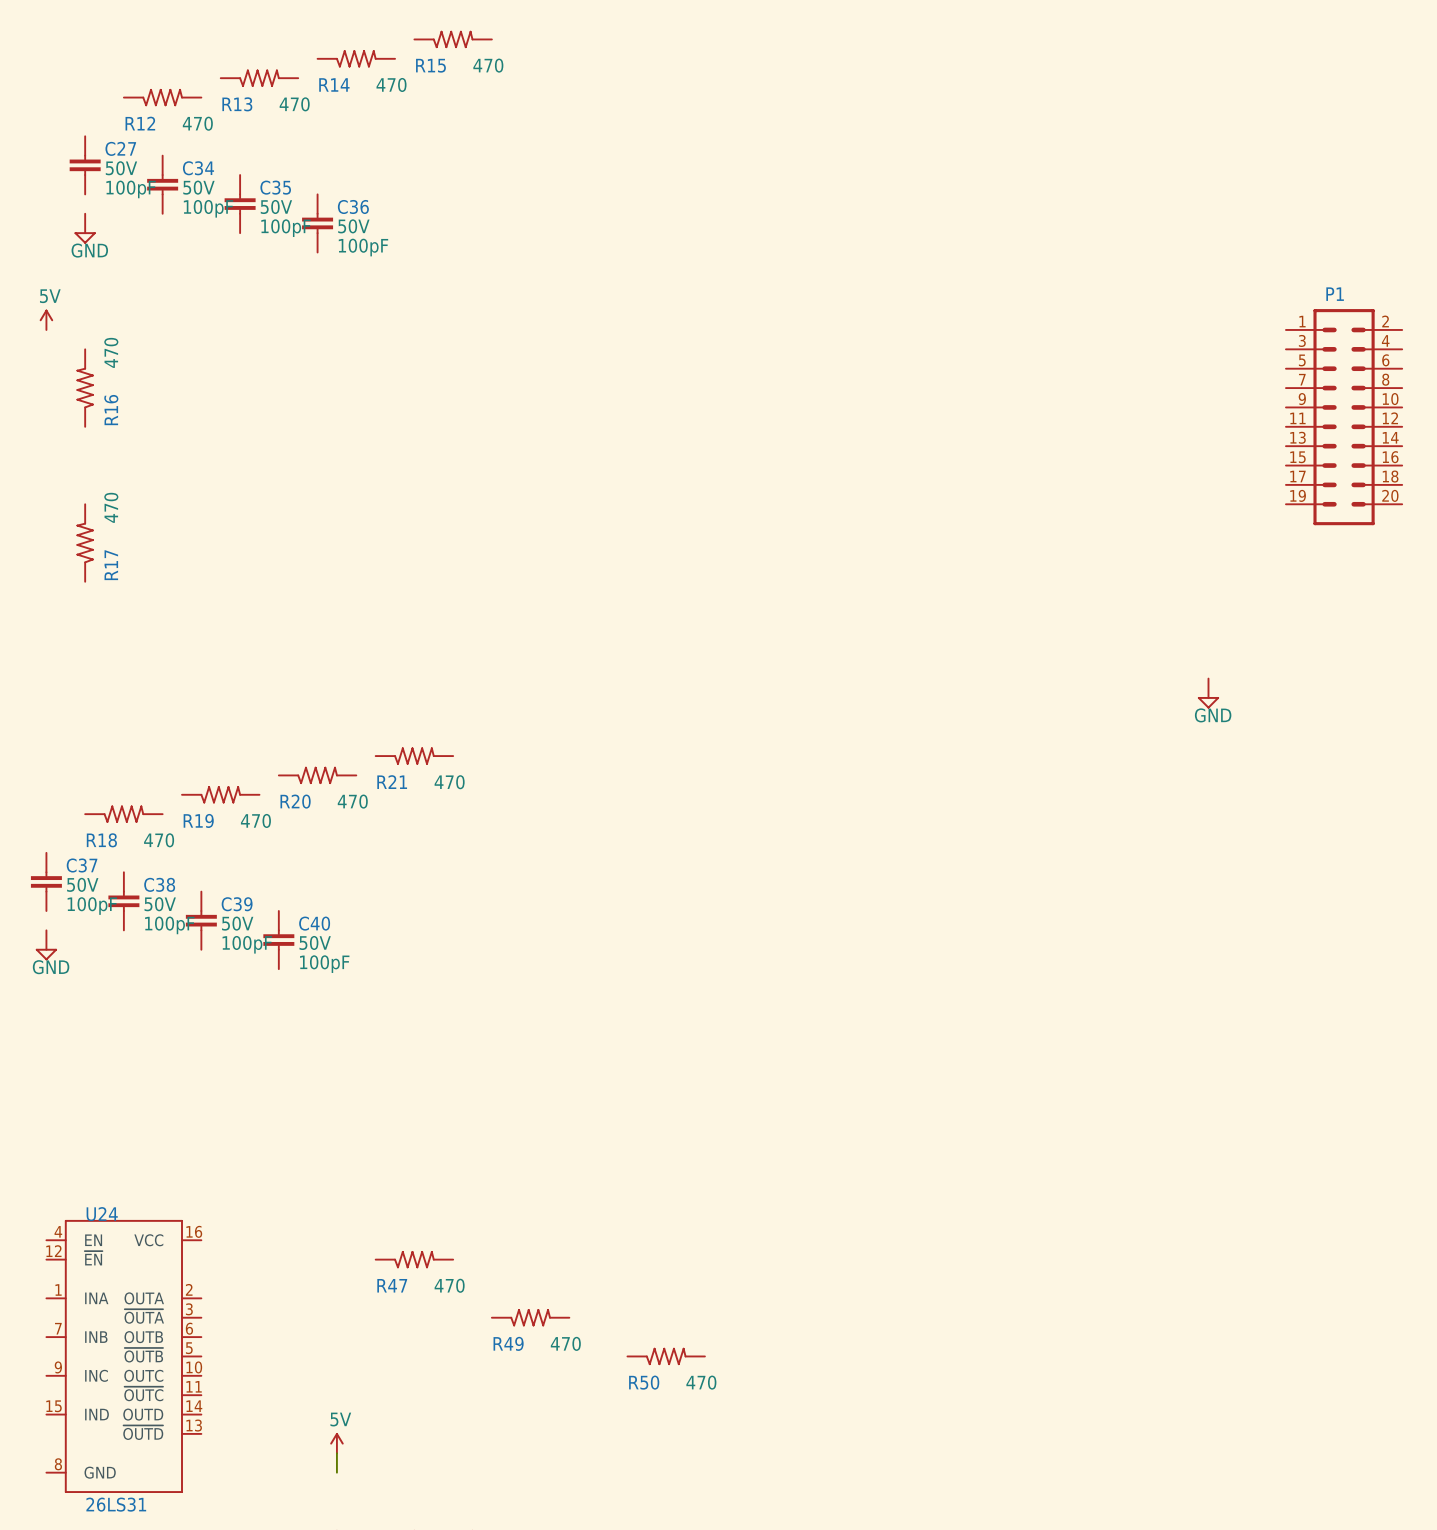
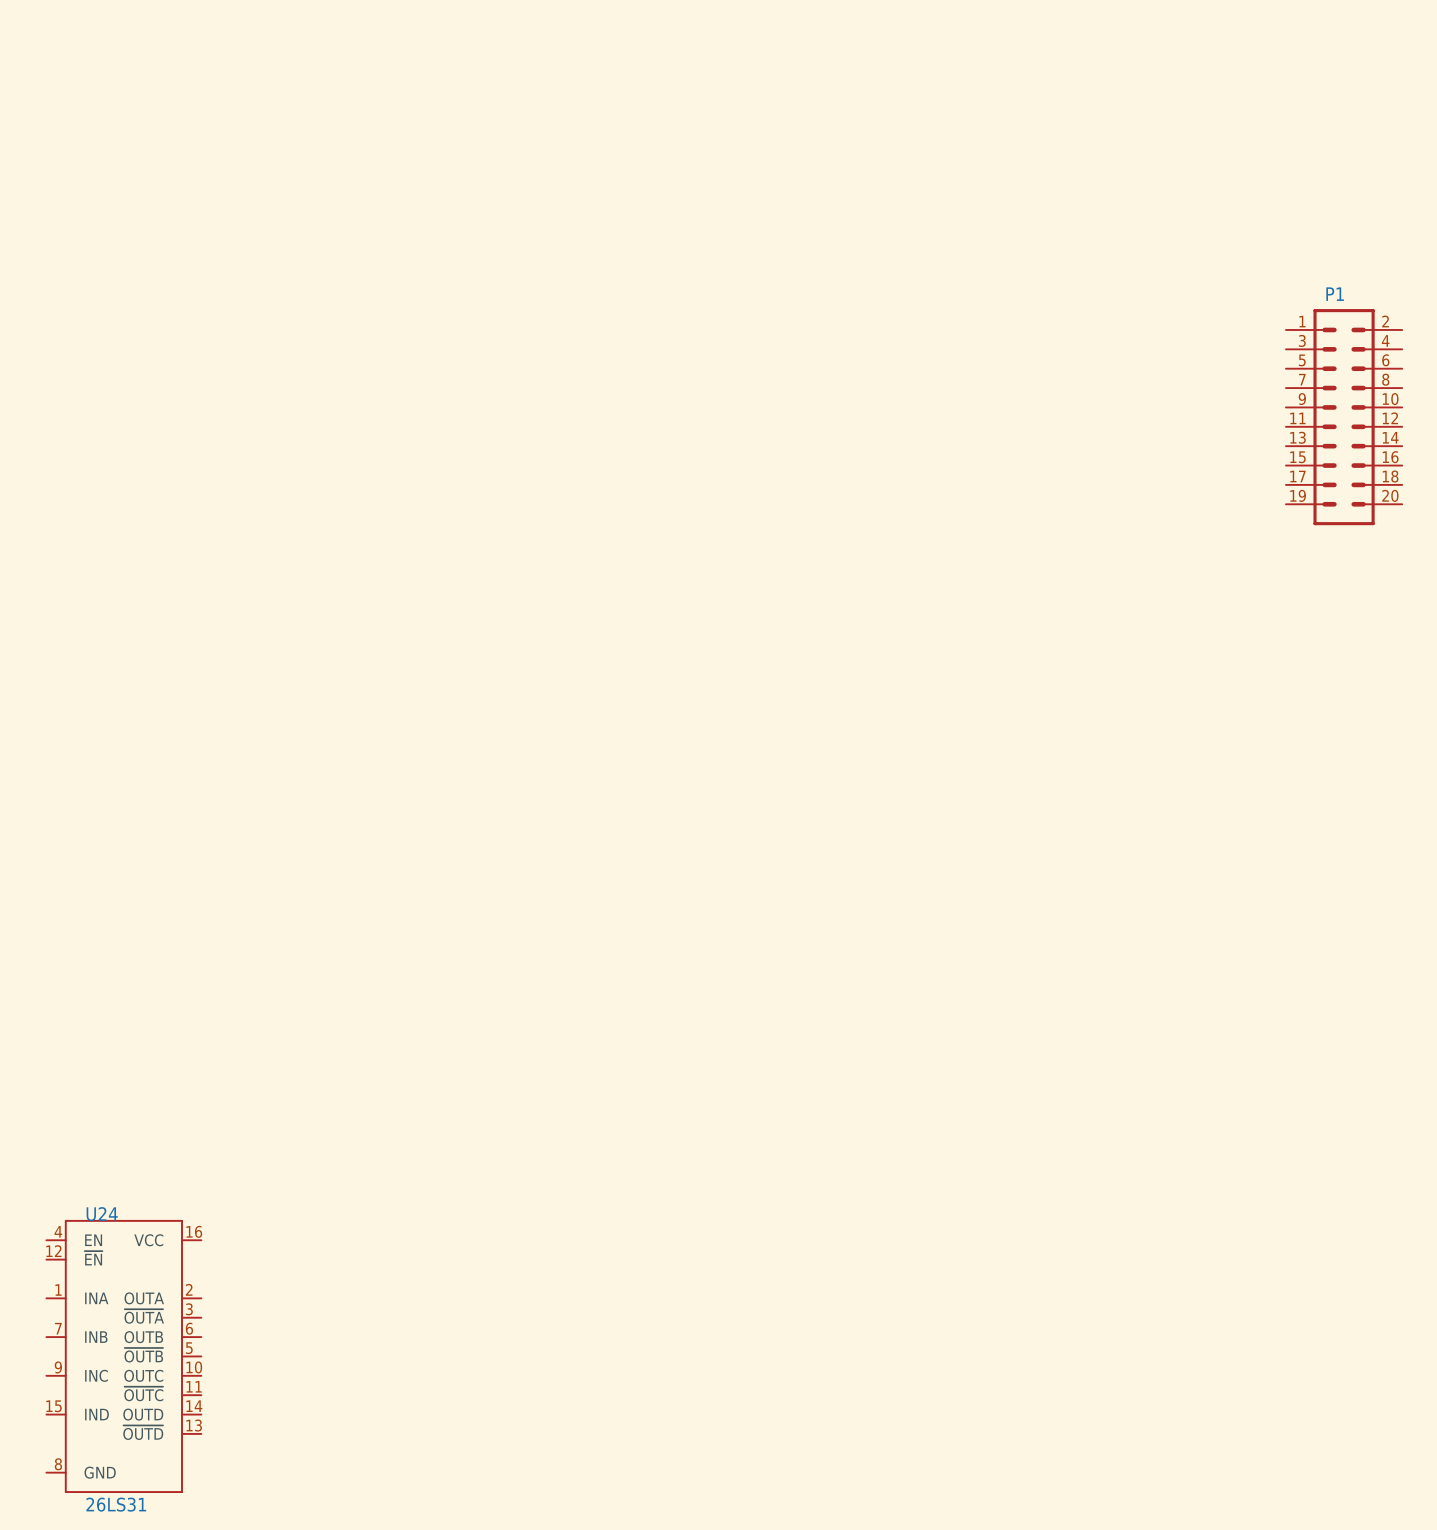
R15: 470 (453, 39) -> none
R14: 470 (356, 58) -> none
R13: 470 (259, 78) -> none
R12: 470 (162, 97) -> none
C27: 100pF (85, 165) -> none
C34: 100pF (162, 184) -> none
C35: 100pF (240, 204) -> none
C36: 100pF (317, 223) -> none
power symbol: GND (85, 228) -> none
power symbol: 5V (46, 319) -> none
R16: 470 (85, 388) -> none
R17: 470 (85, 543) -> none
power symbol: GND (1208, 693) -> none
R21: 470 (414, 756) -> none
R20: 470 (317, 775) -> none
R19: 470 (220, 794) -> none
R18: 470 (123, 814) -> none
C37: 100pF (46, 881) -> none
C38: 100pF (123, 901) -> none
C39: 100pF (201, 920) -> none
C40: 100pF (278, 940) -> none
power symbol: GND (46, 945) -> none
R47: 470 (414, 1259) -> none
R49: 470 (530, 1317) -> none
R50: 470 (666, 1356) -> none
power symbol: 5V (336, 1443) -> none
wire: (336, 1453) (336, 1472) -> none

